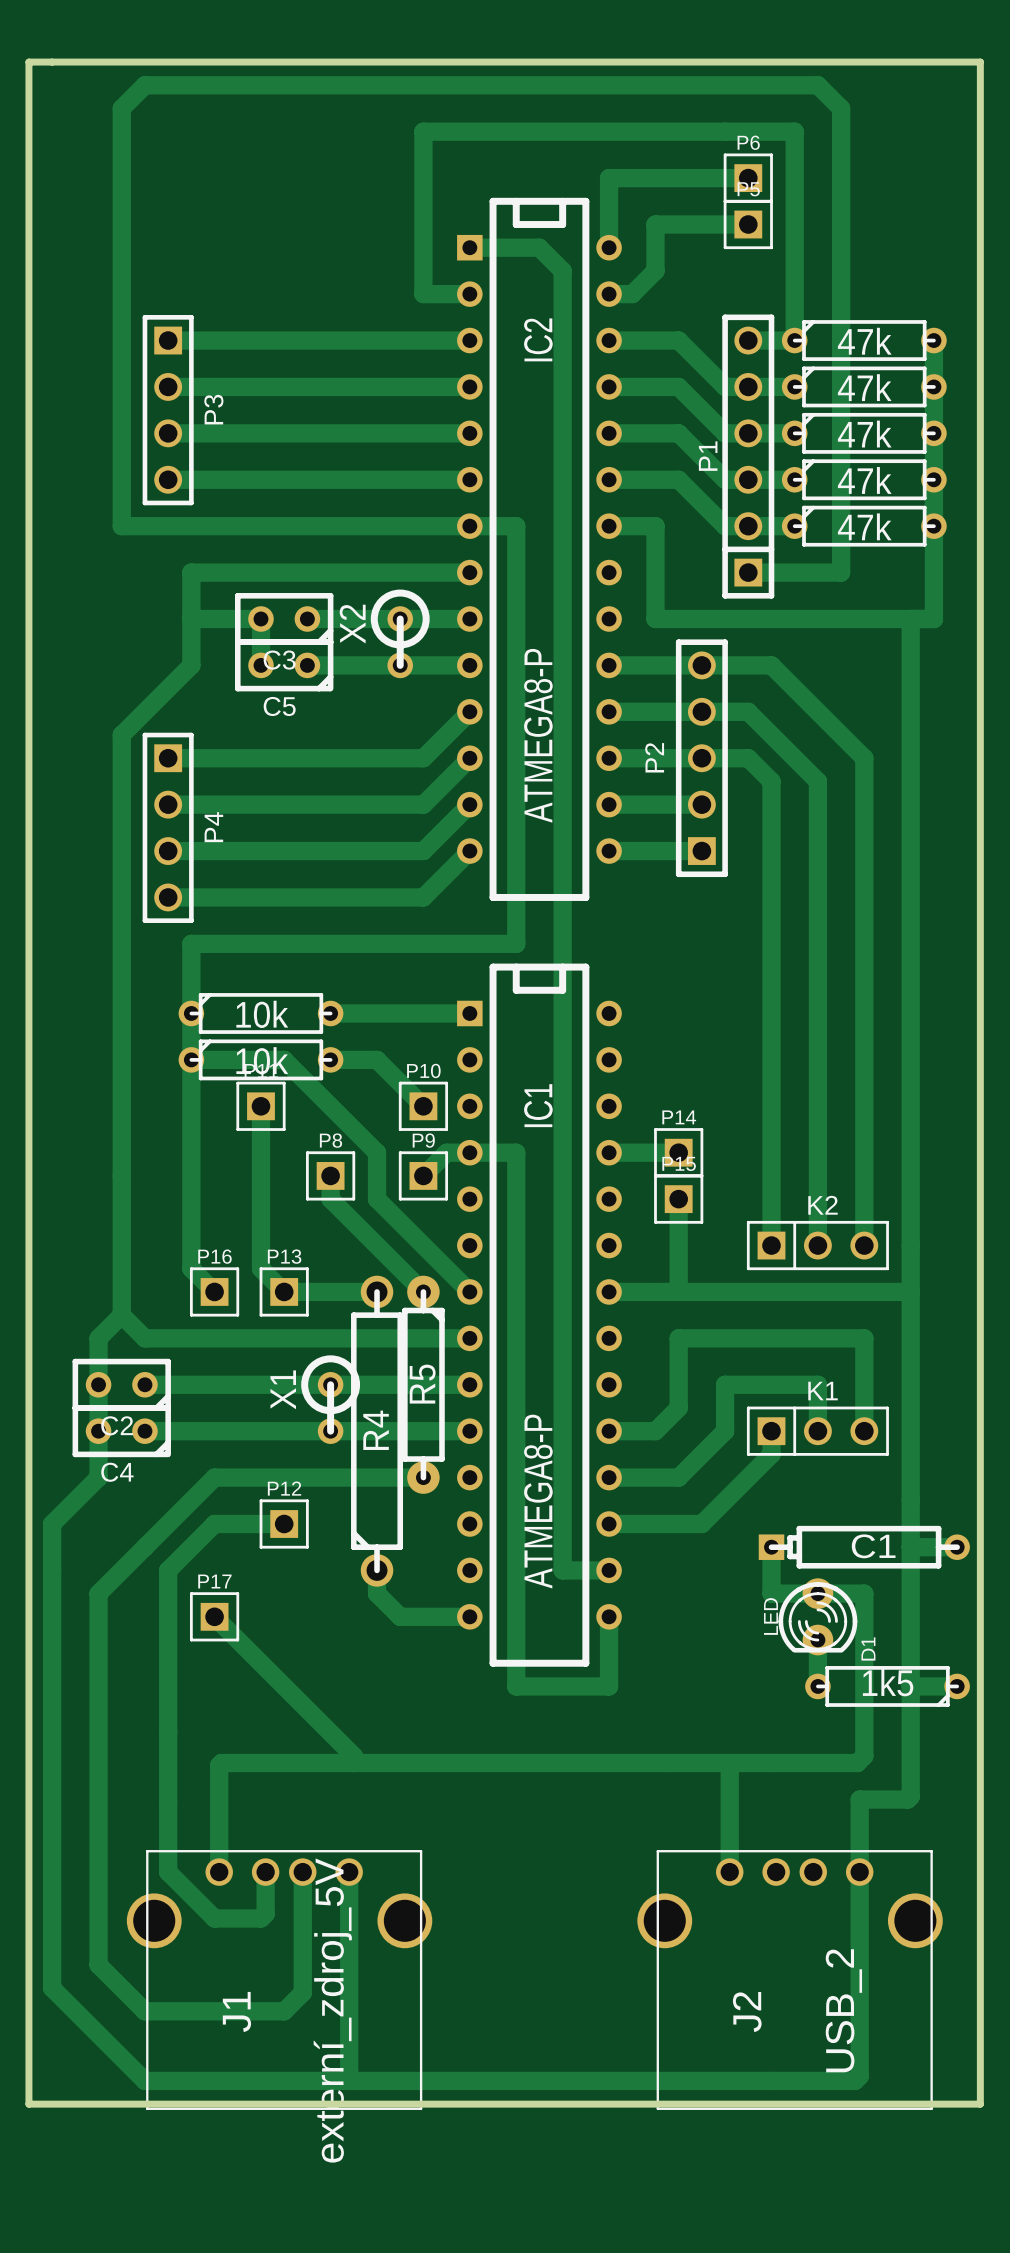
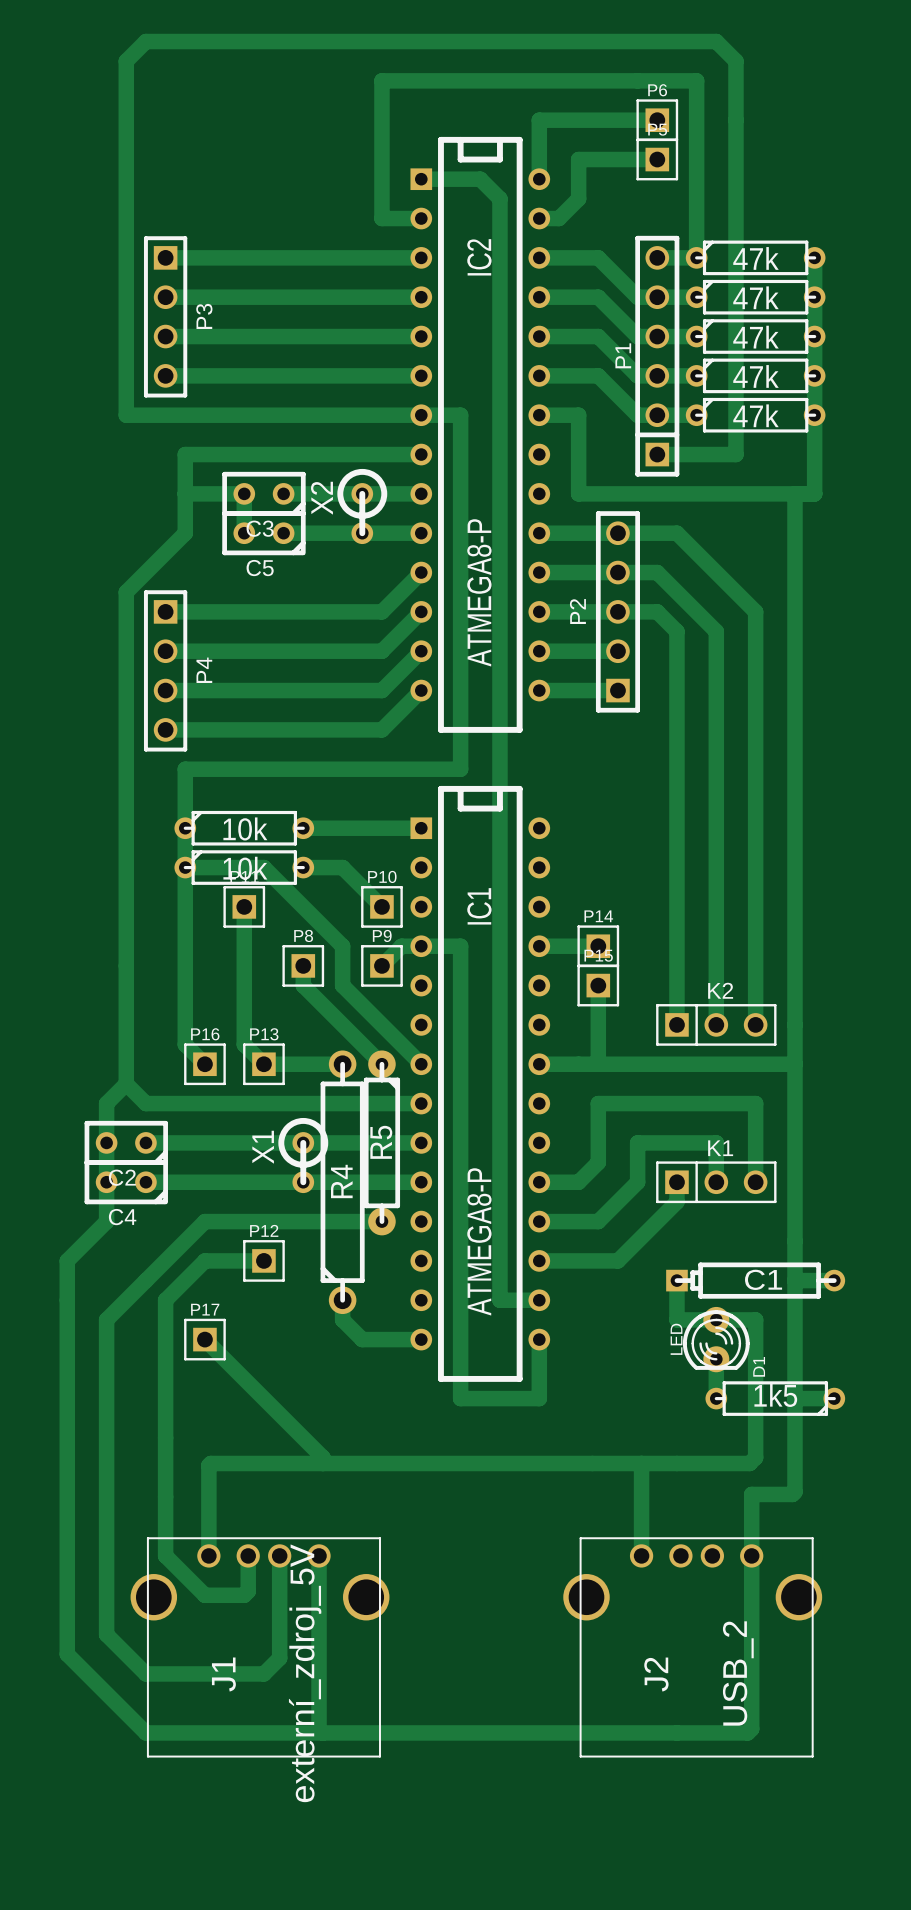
board edge: (28, 62) (28, 2104) (980, 2104) (980, 62) (28, 62) -> none

